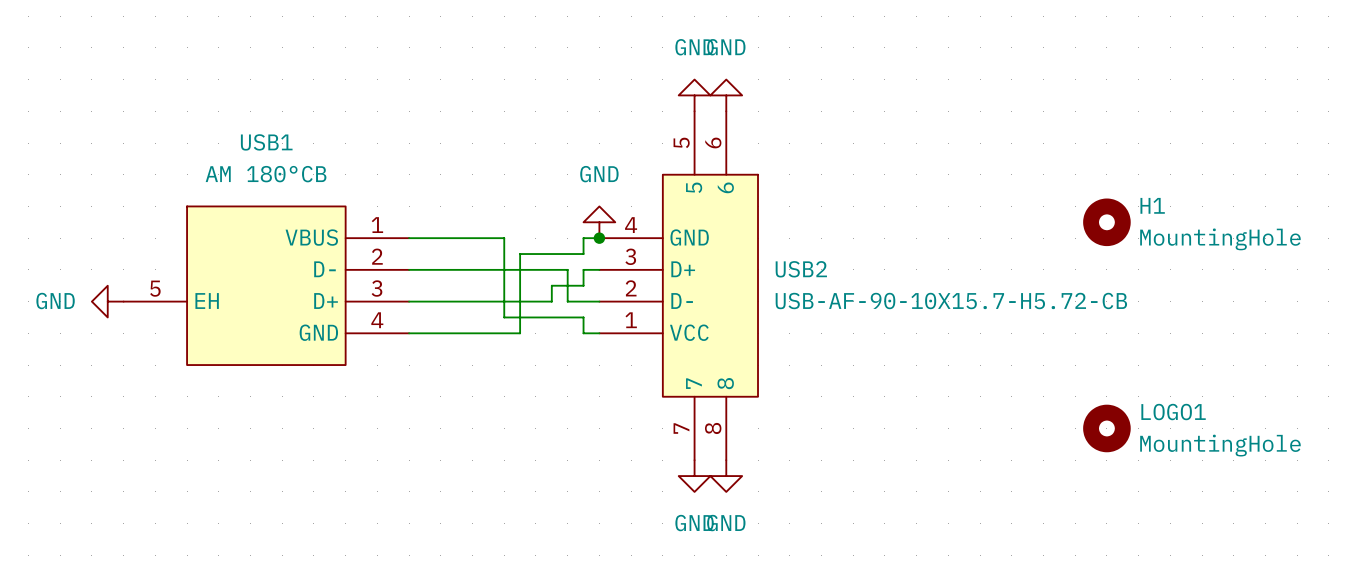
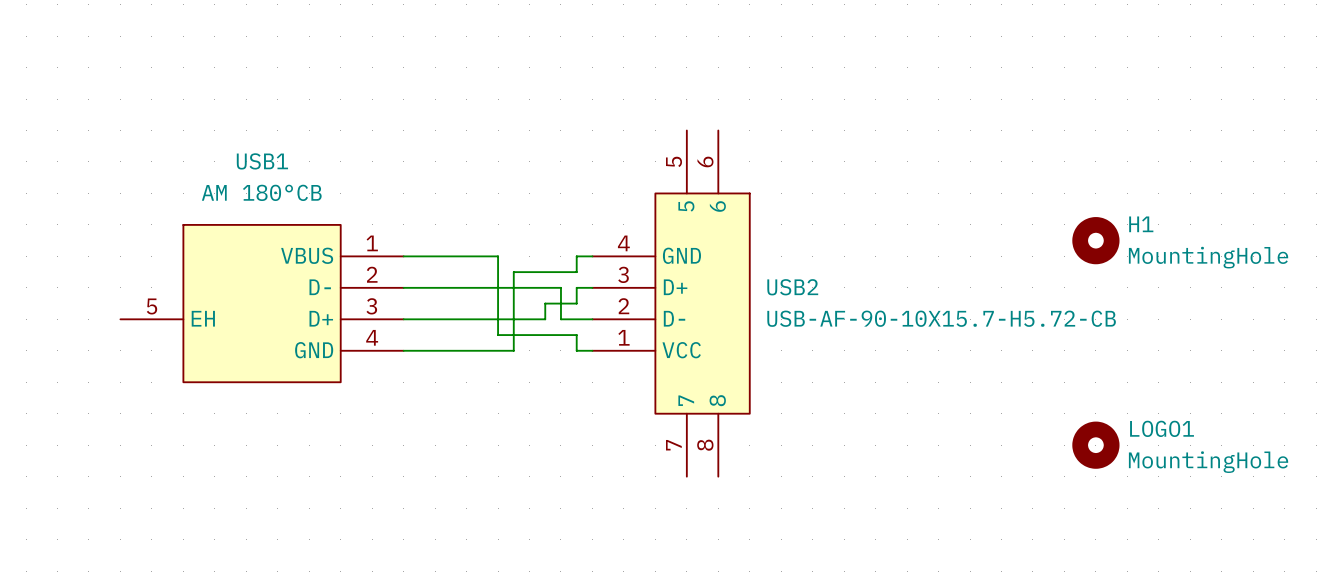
power symbol: GND (694, 95) -> none
power symbol: GND (726, 95) -> none
power symbol: GND (599, 222) -> none
junction: (599, 238) -> none
power symbol: GND (107, 301) -> none
power symbol: GND (694, 476) -> none
power symbol: GND (726, 476) -> none

